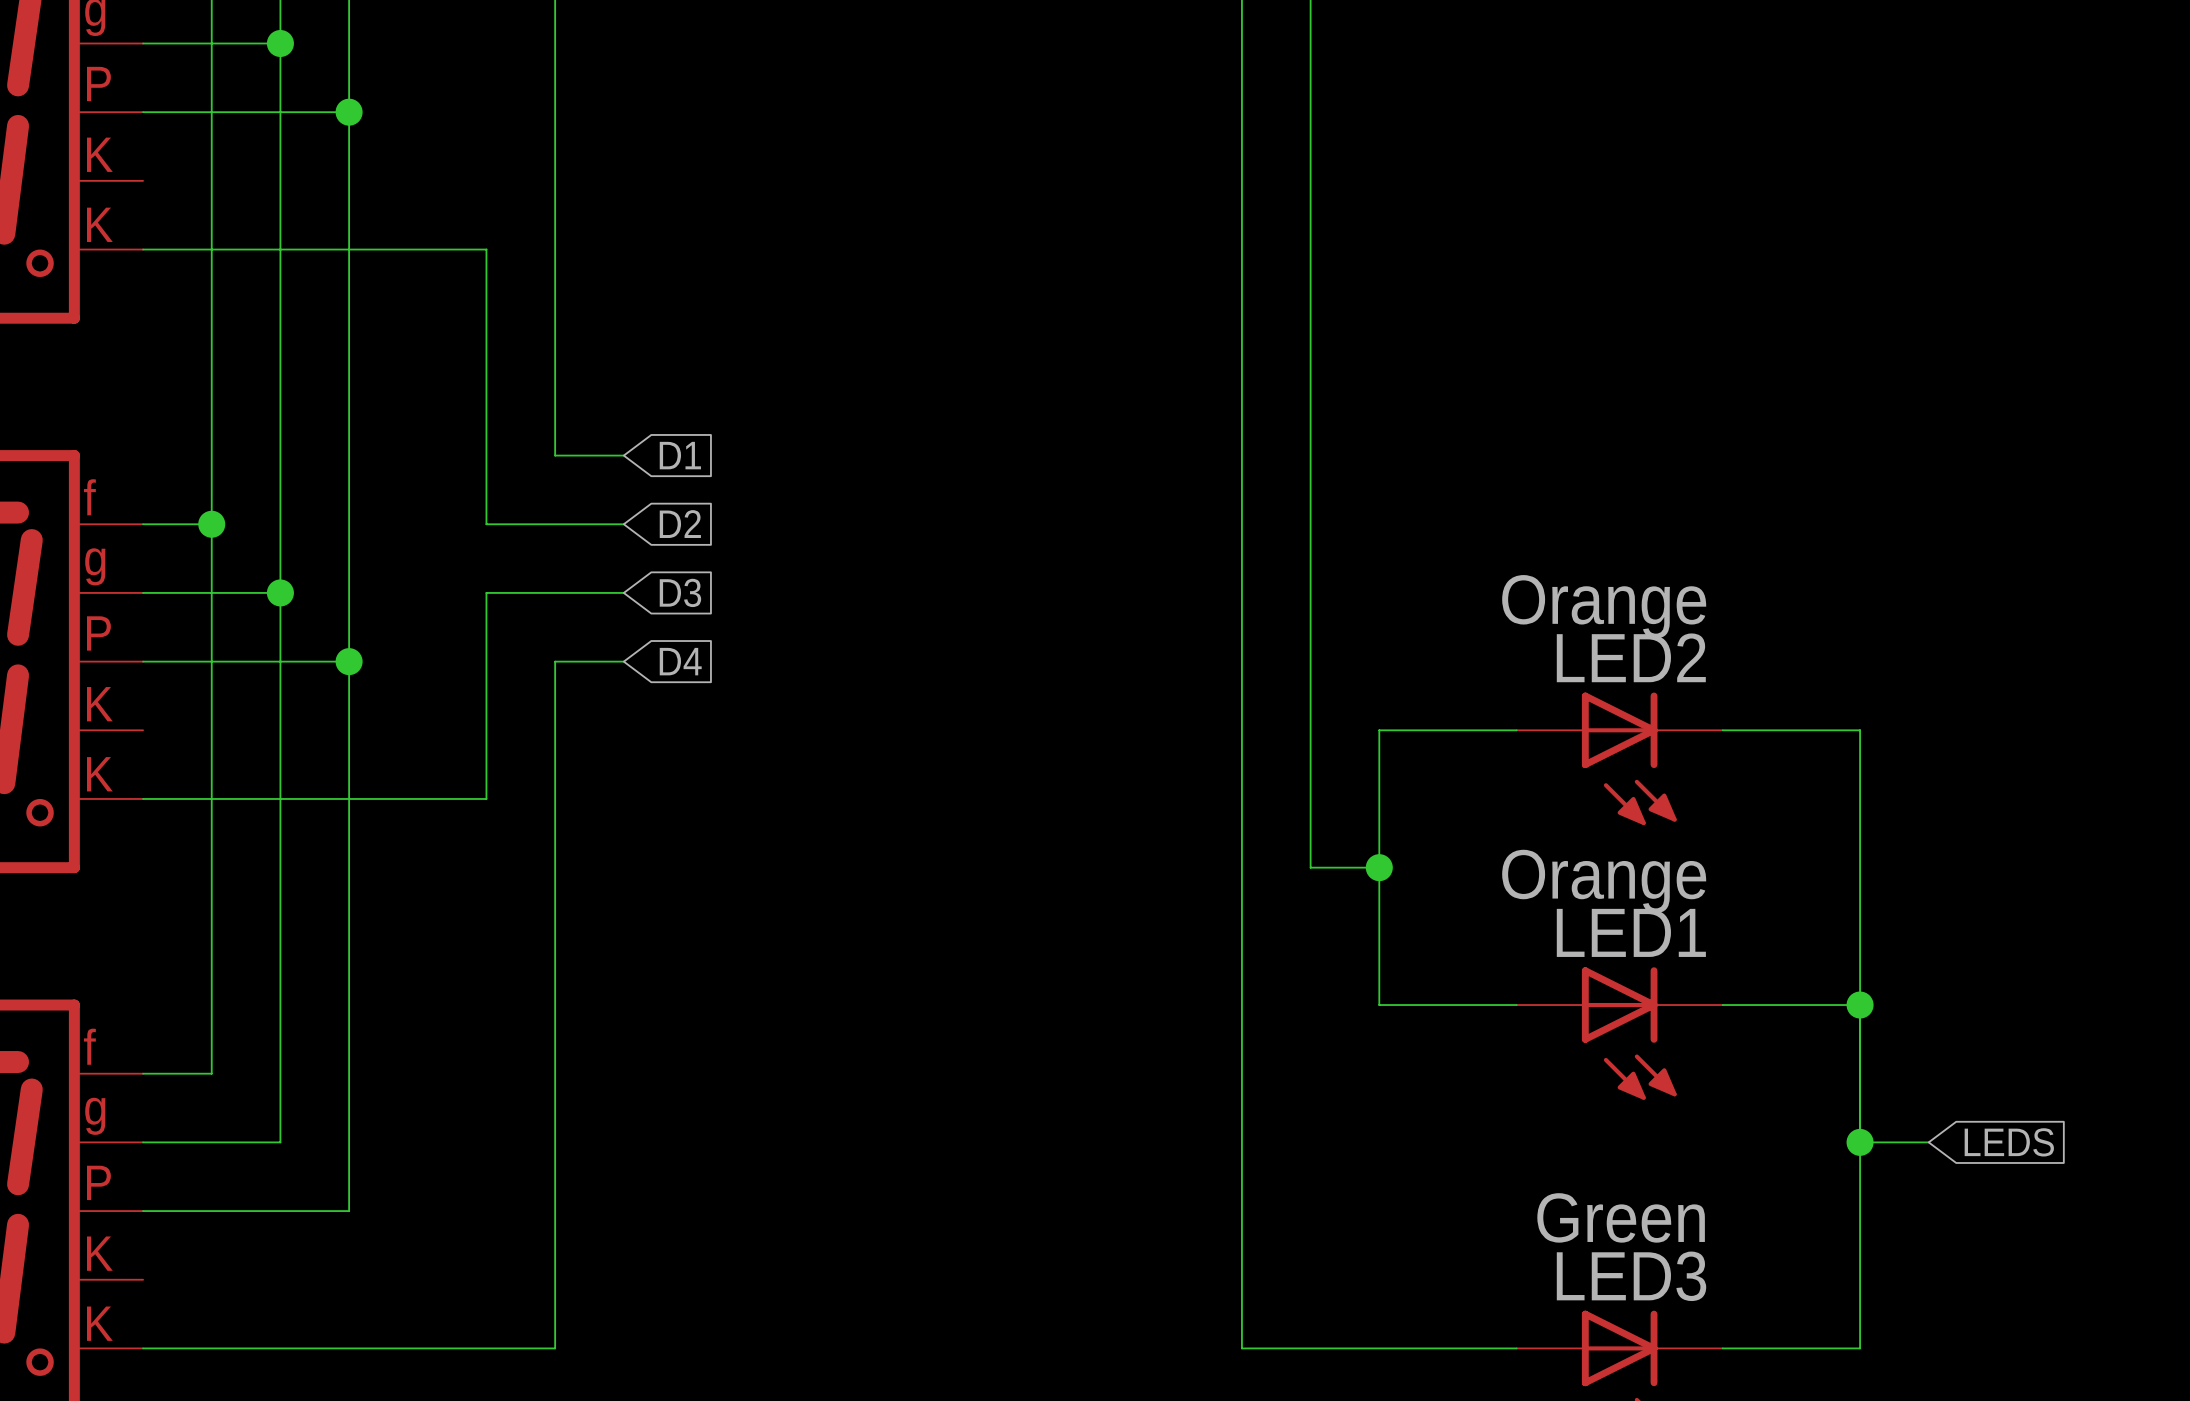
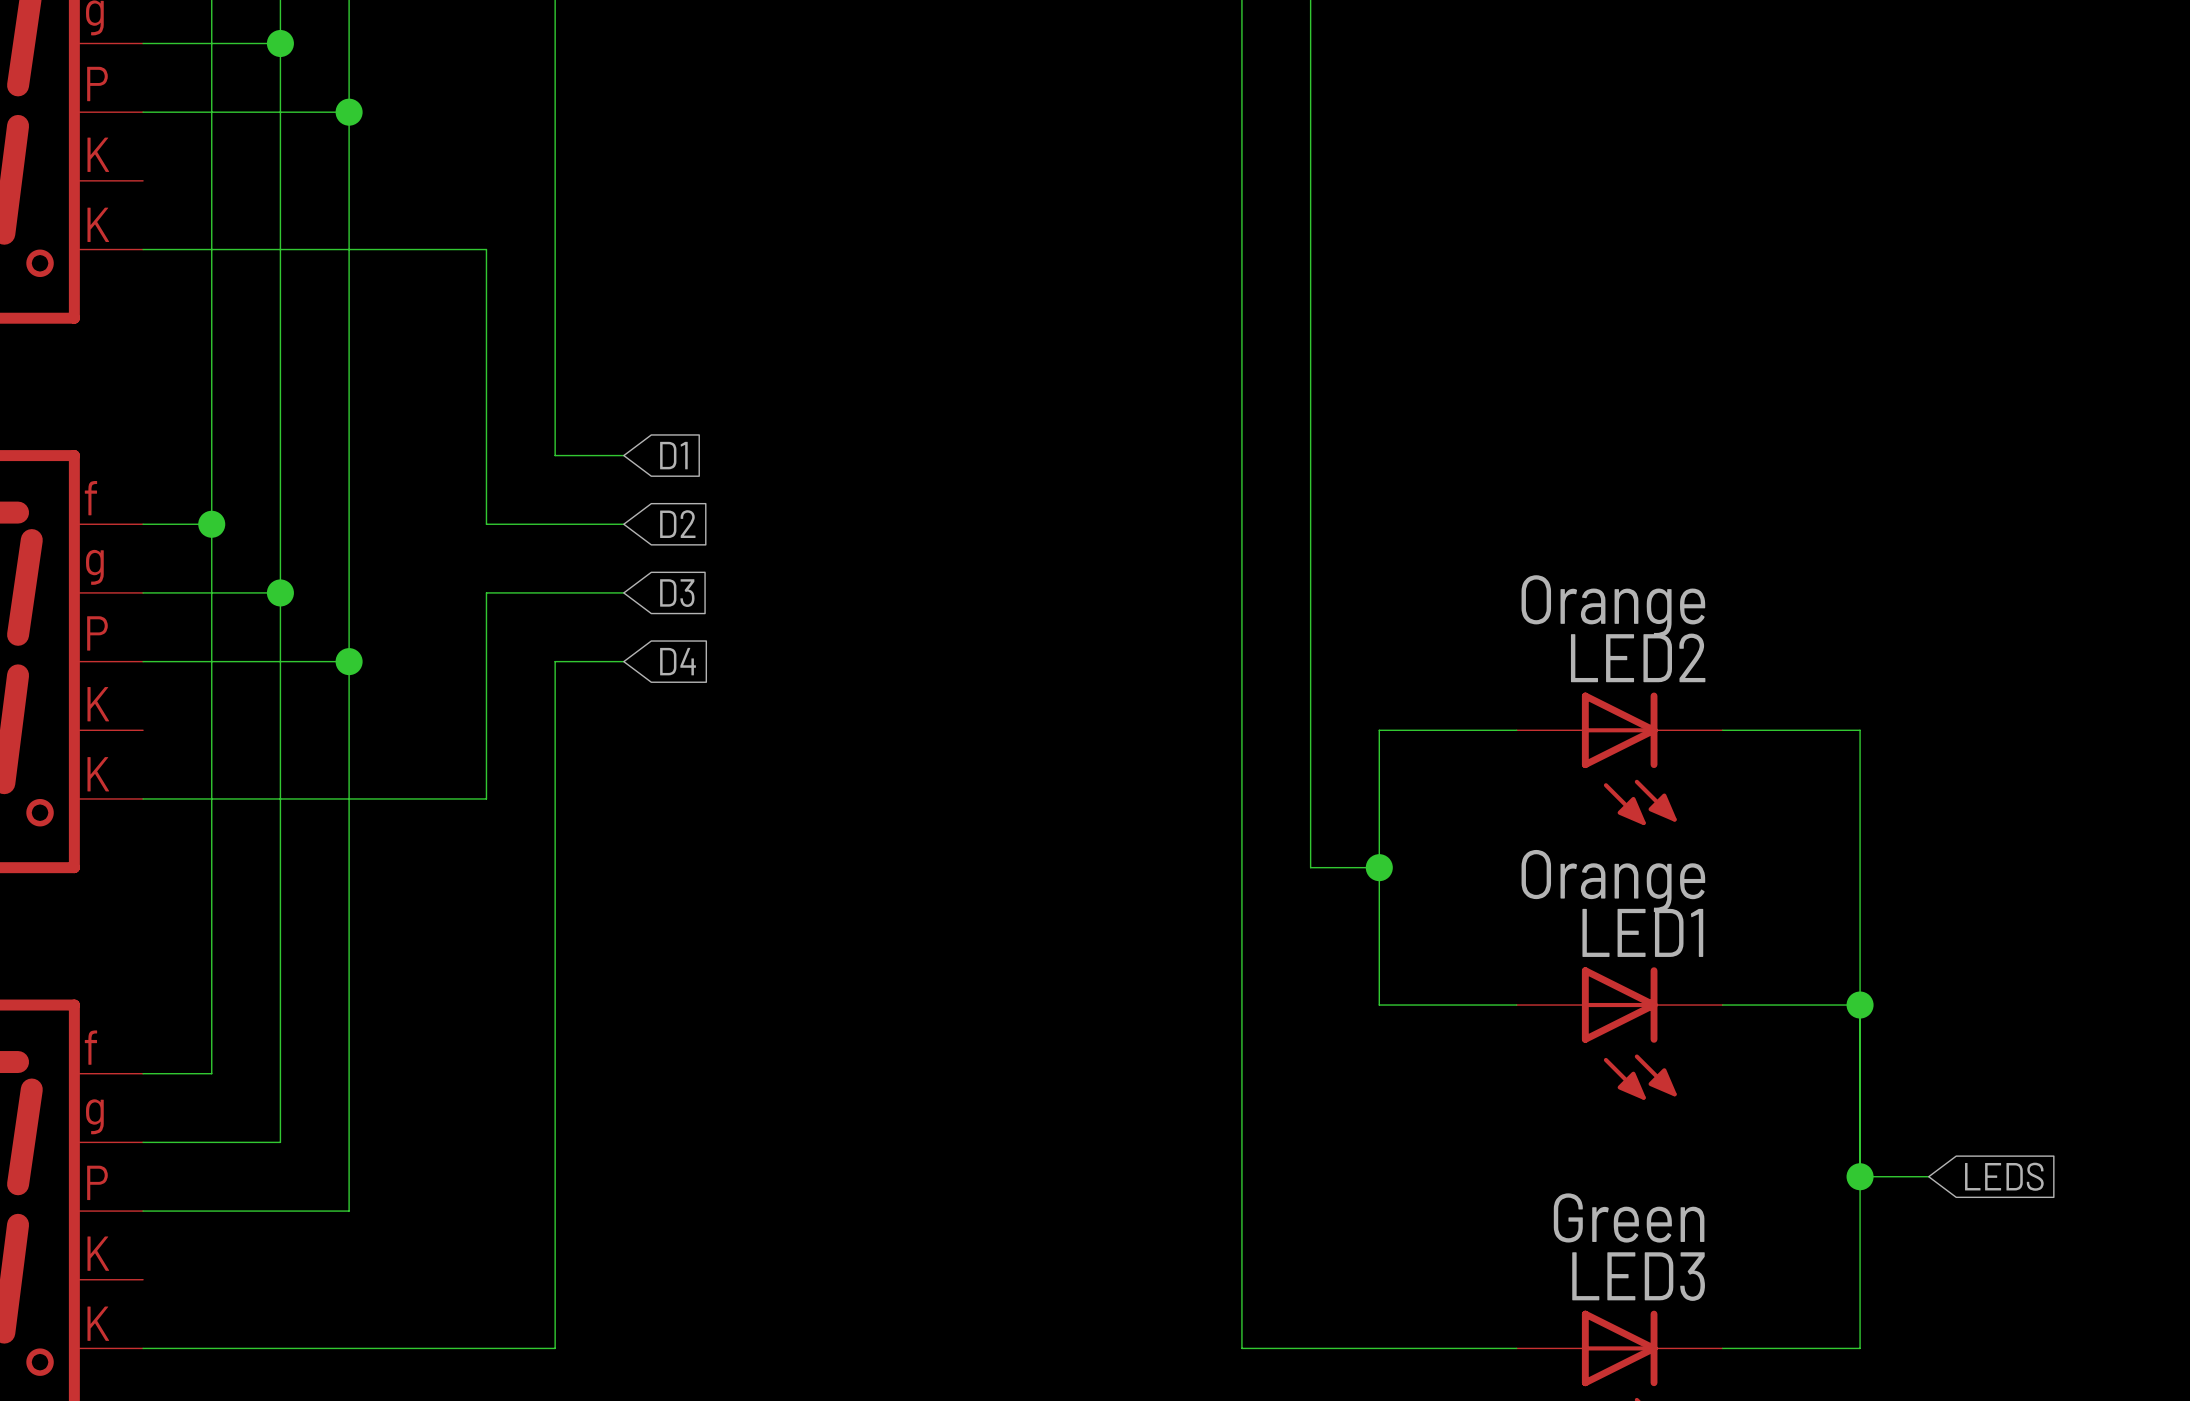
wire: (1860, 1142) (1928, 1142) -> (1860, 1176) (1928, 1176)
junction position: (1860, 1142) -> (1860, 1176)
global label position: LEDS (2009, 1142) -> LEDS (2004, 1176)

